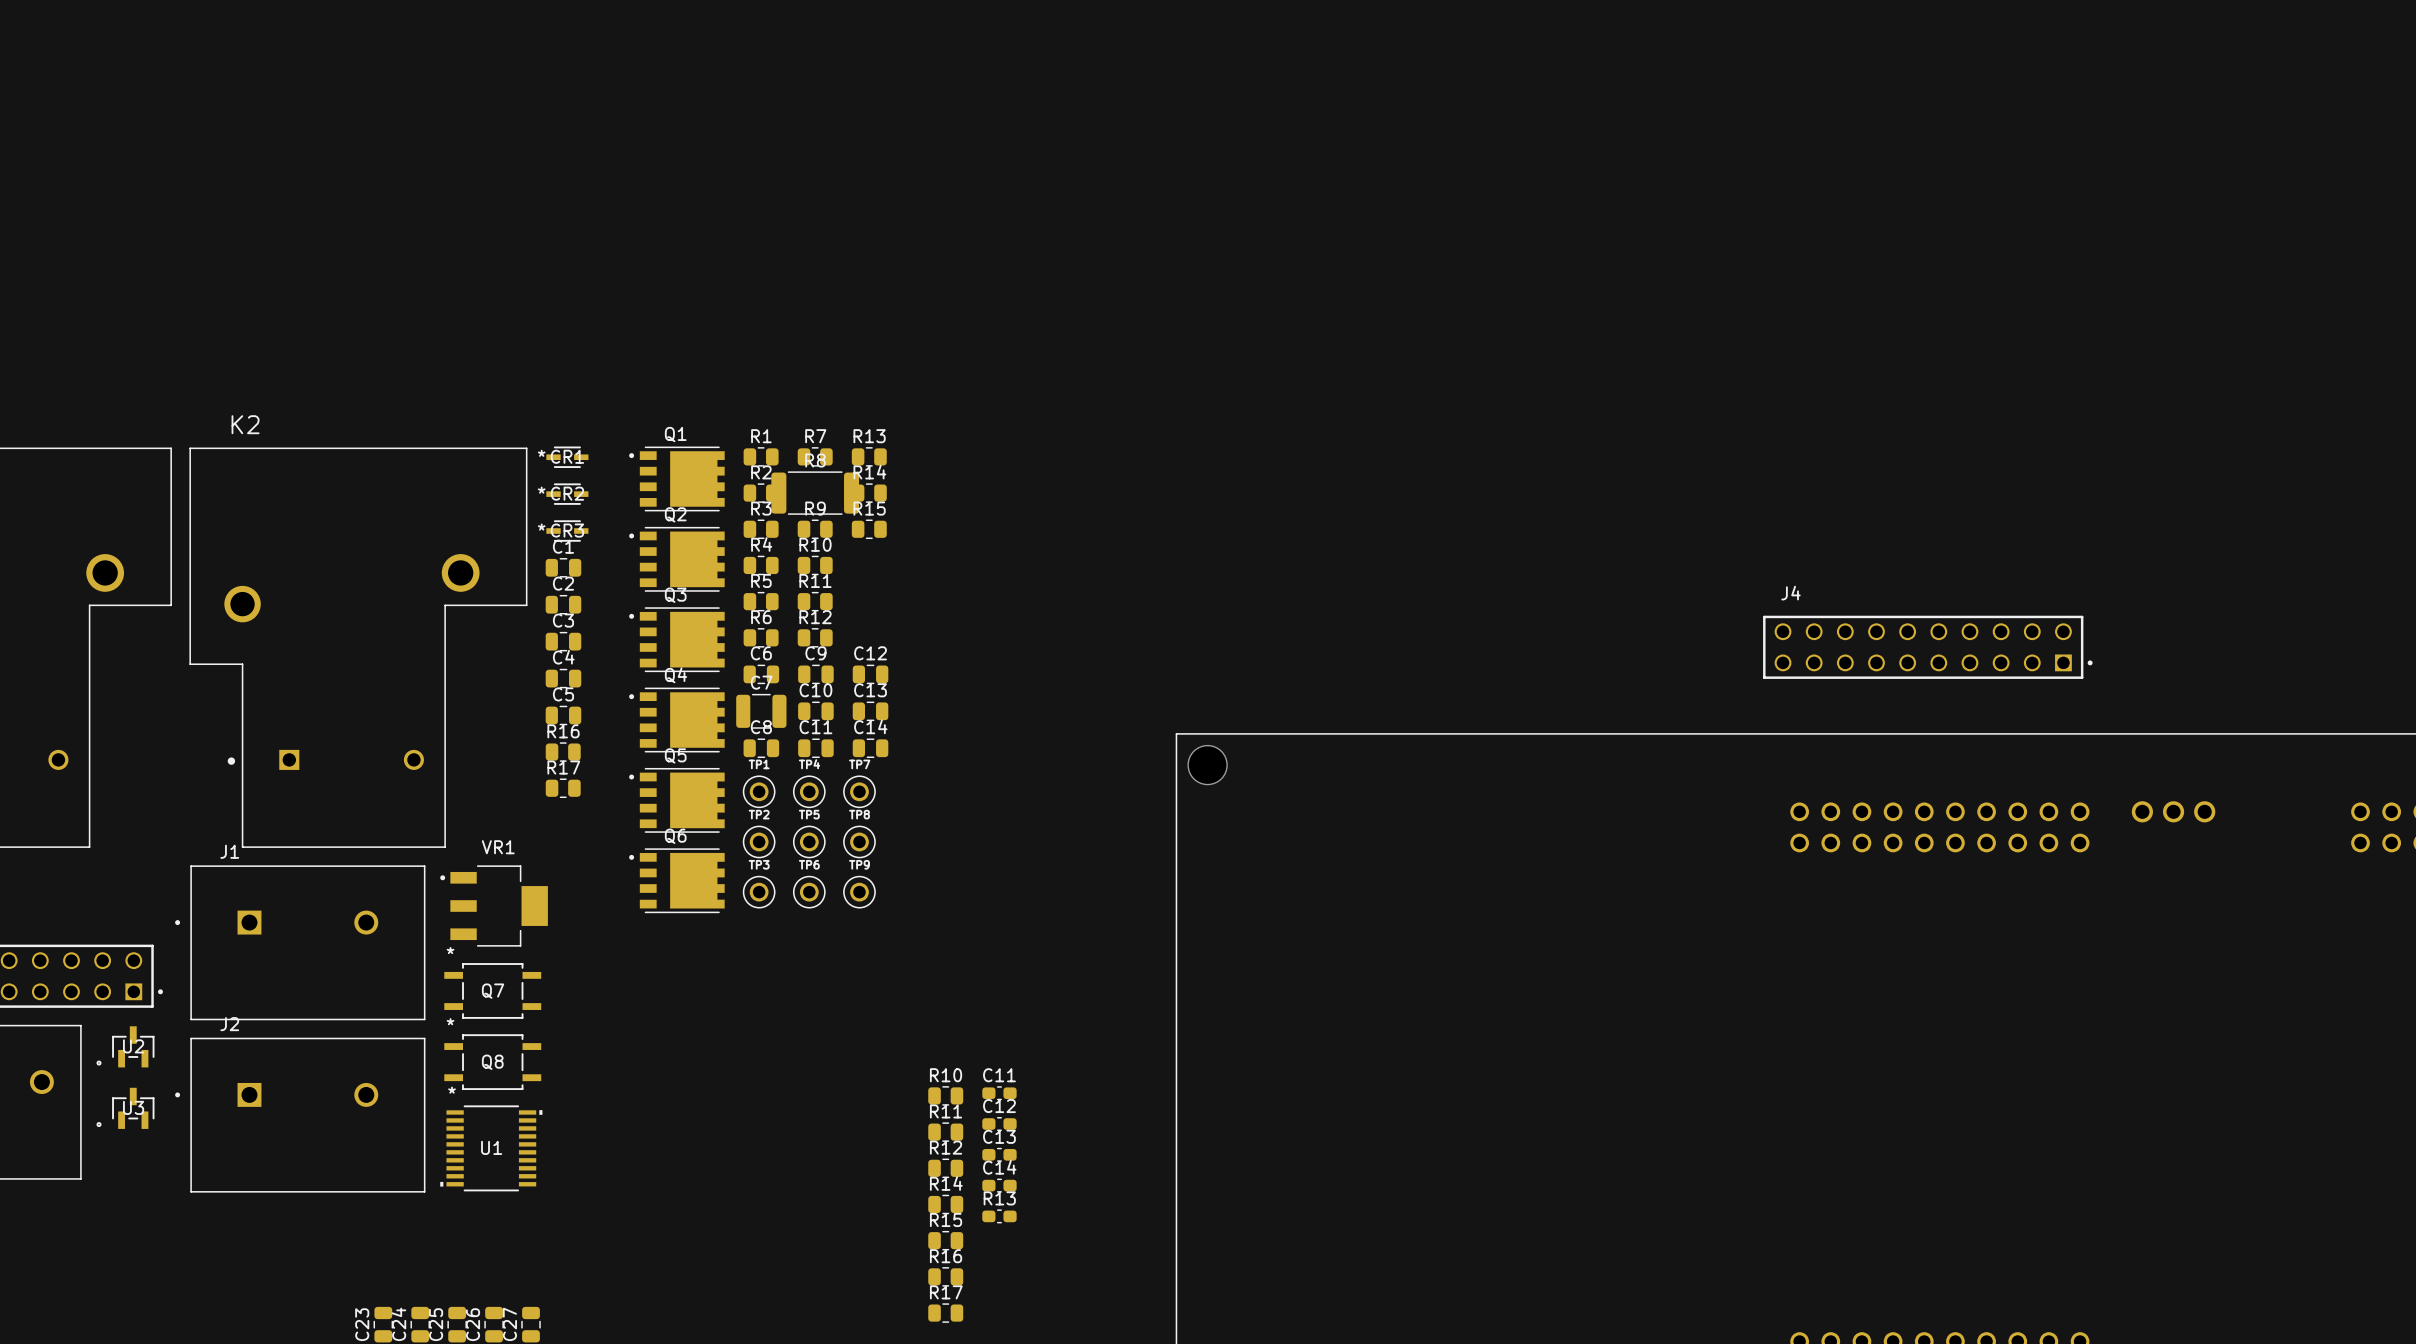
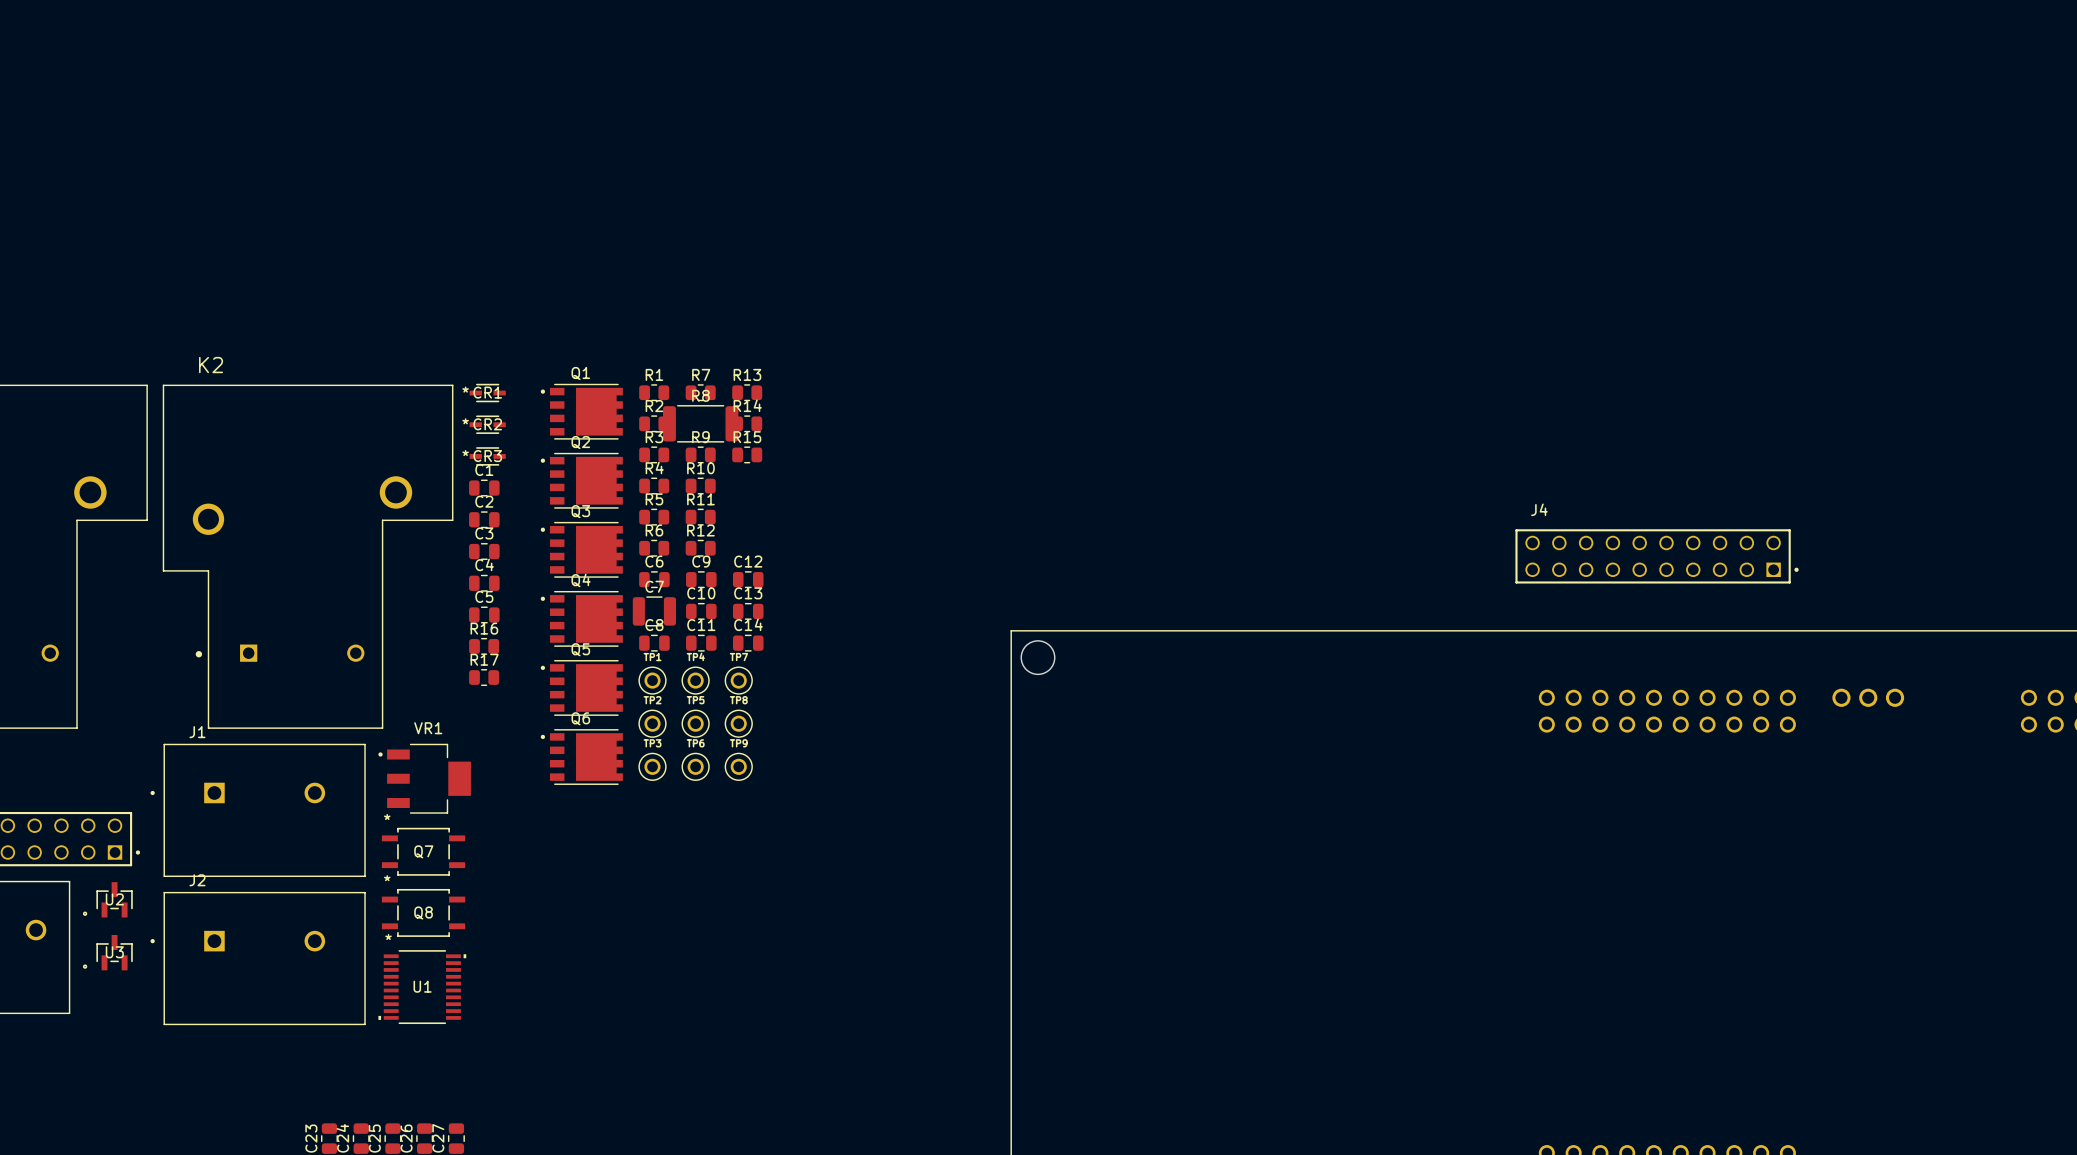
C11: (999, 1093) -> none
R10: (945, 1095) -> none
C12: (999, 1124) -> none
R11: (945, 1132) -> none
C13: (999, 1154) -> none
R12: (945, 1168) -> none
C14: (999, 1185) -> none
R14: (945, 1204) -> none
R13: (999, 1216) -> none
R15: (945, 1240) -> none
R16: (945, 1276) -> none
R17: (945, 1313) -> none

